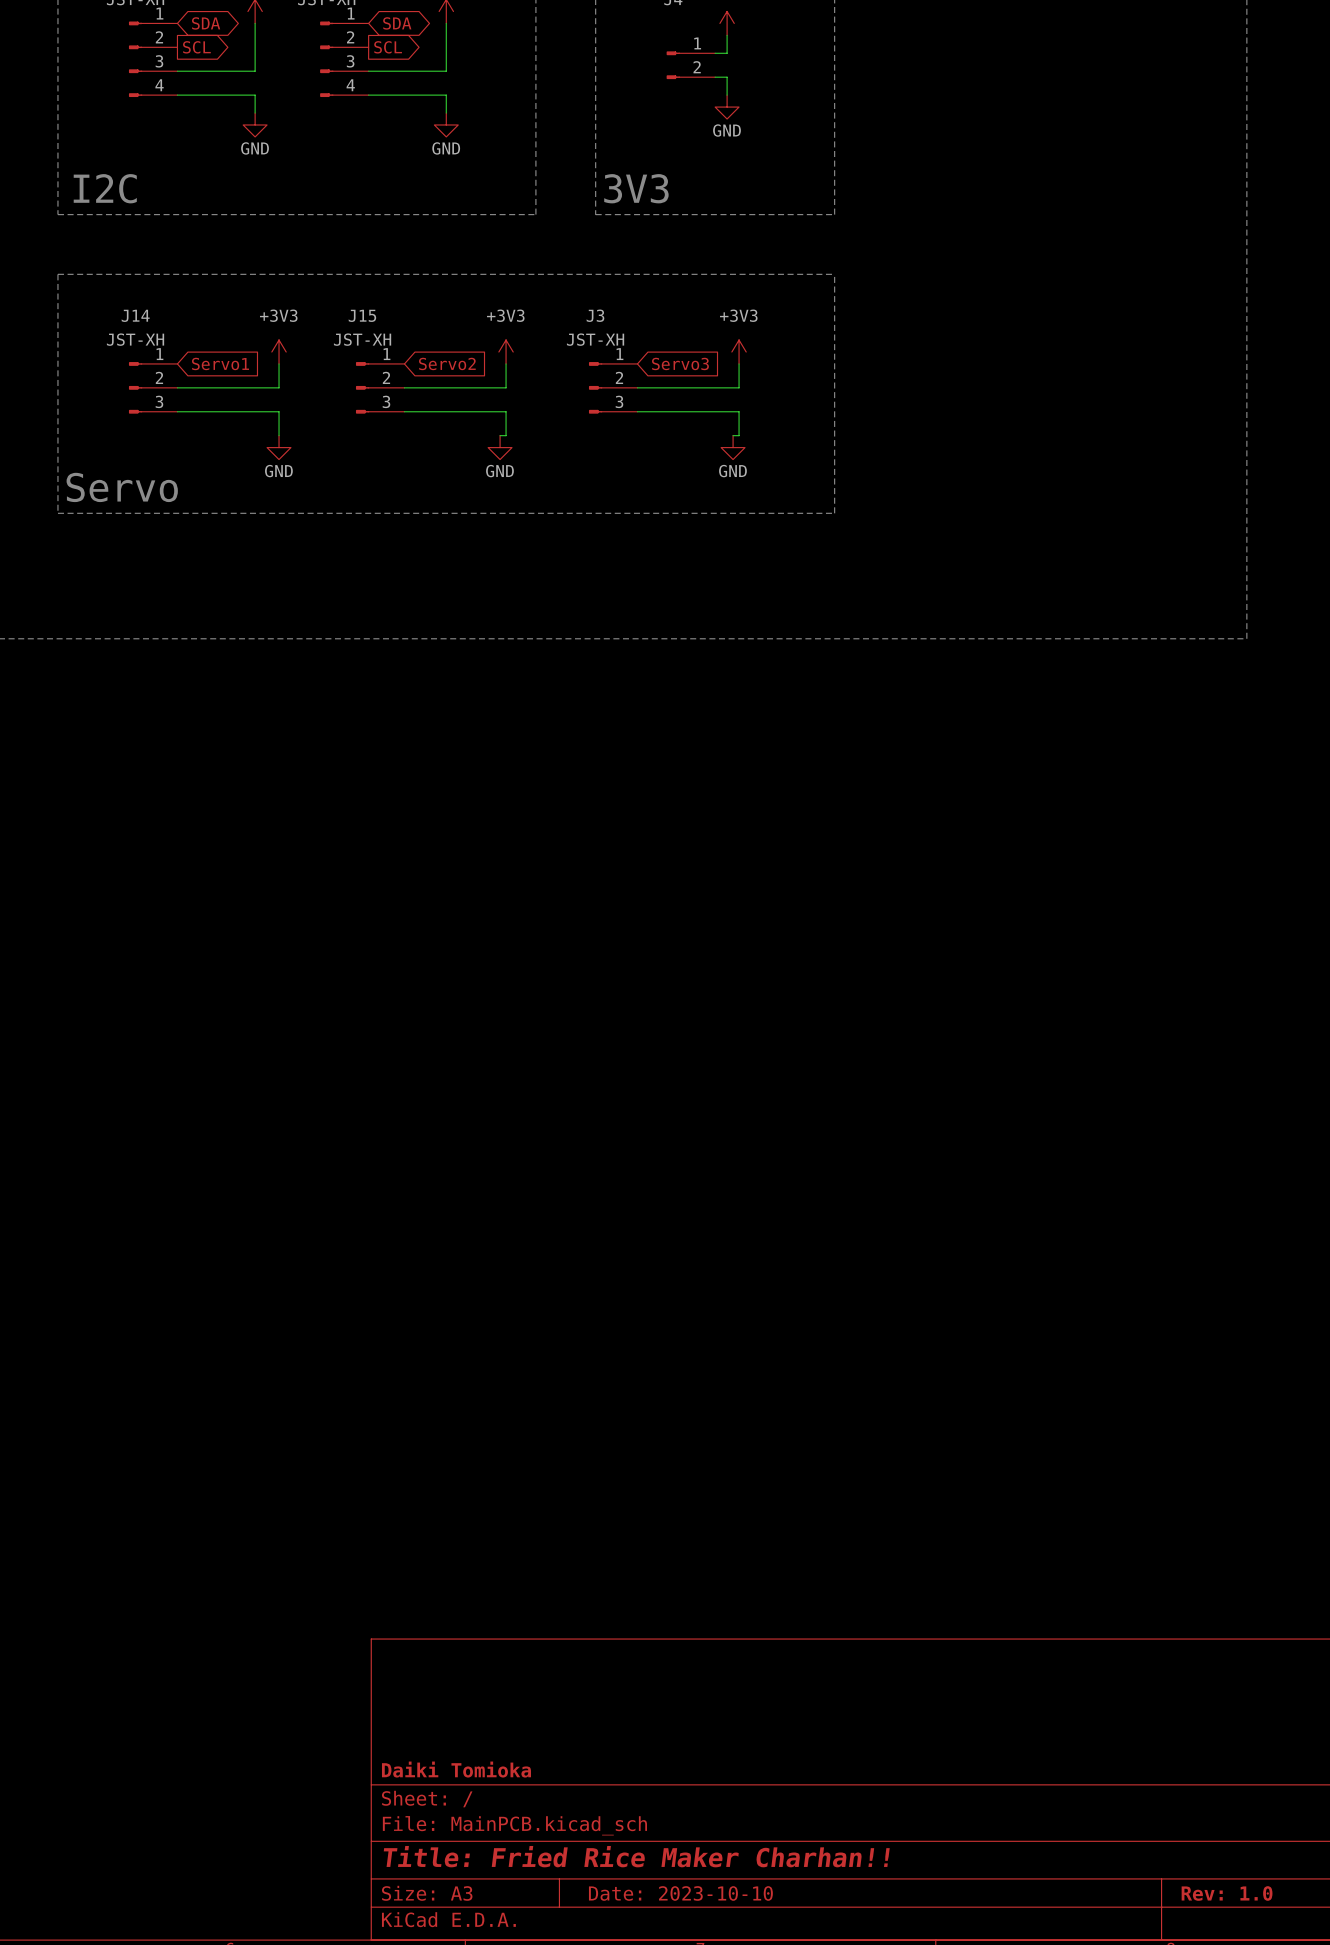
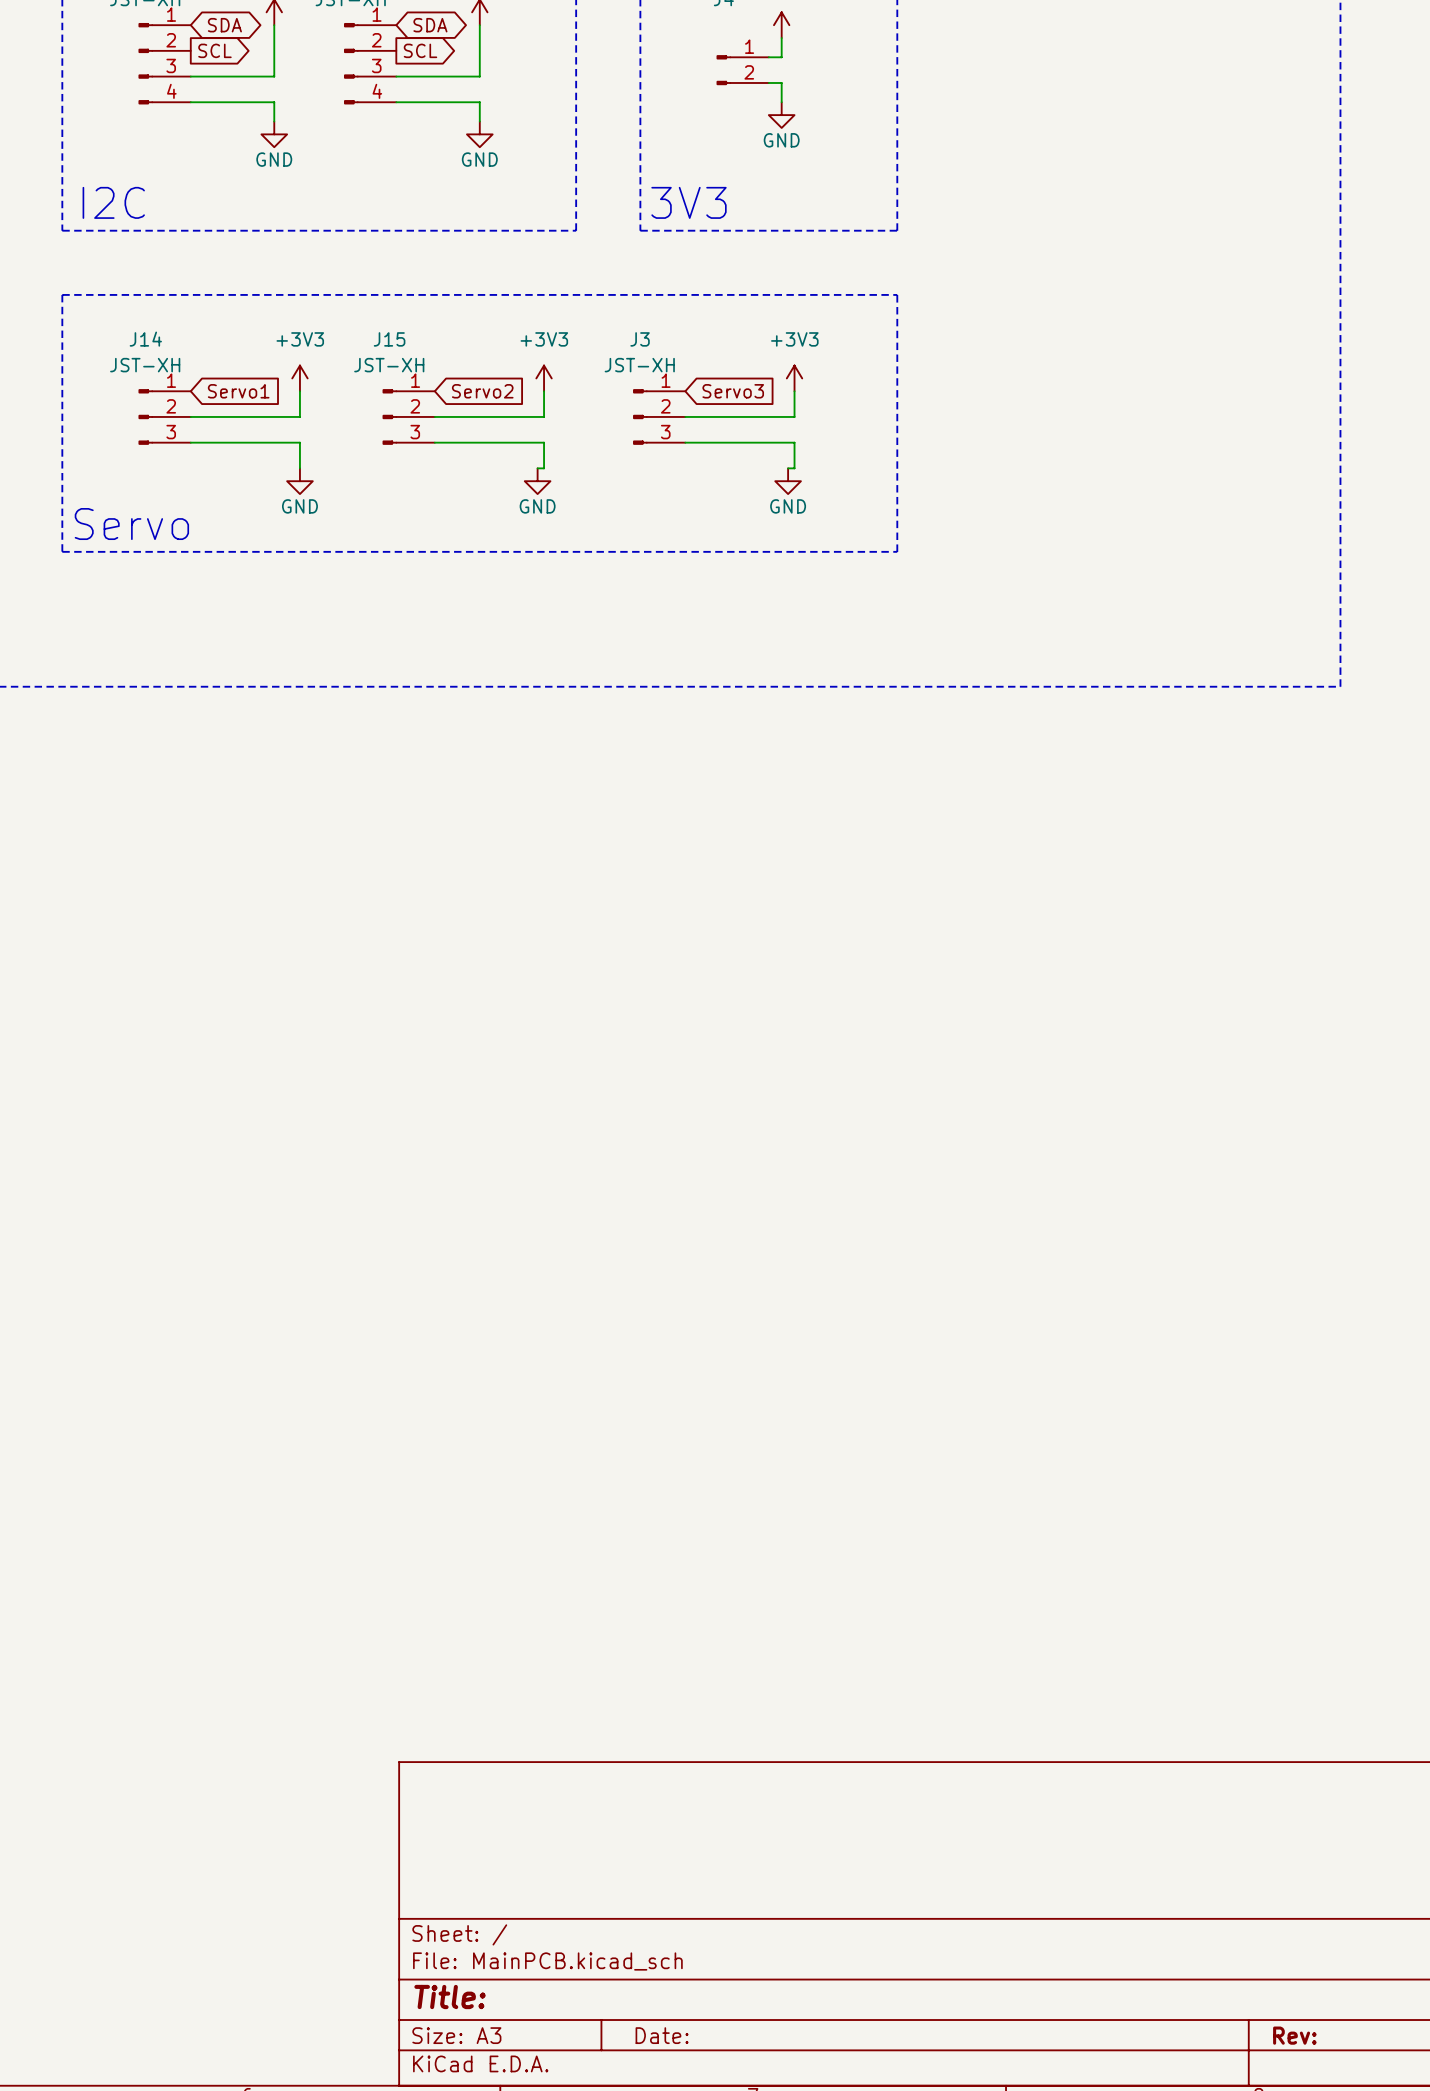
title block: Daiki Tomioka (456, 1769) -> none
title block: Title: Fried Rice Maker Charhan!! (636, 1856) -> Title: (450, 1997)
title block: Date: 2023-10-10 (680, 1893) -> Date: (662, 2035)
title block: Rev: 1.0 (1227, 1893) -> Rev: (1294, 2035)

